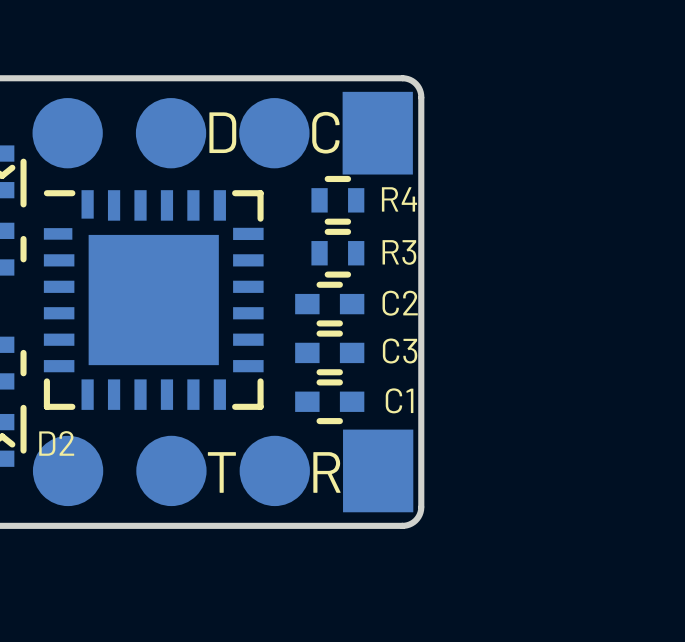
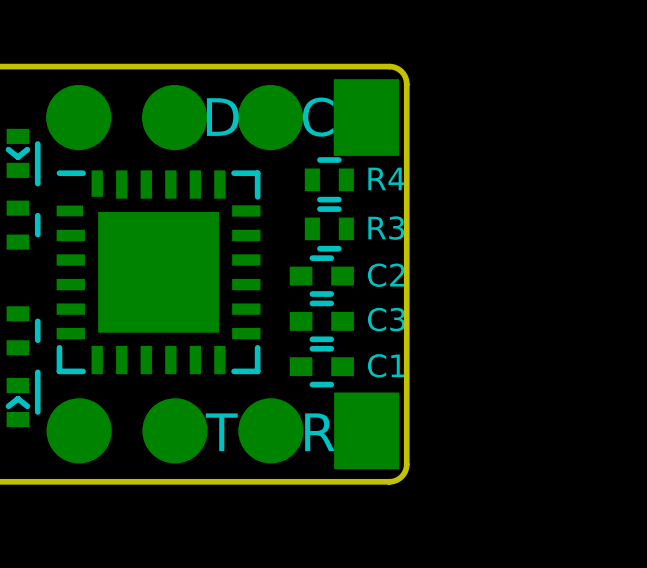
D2 name: D2 (56, 443) -> none

